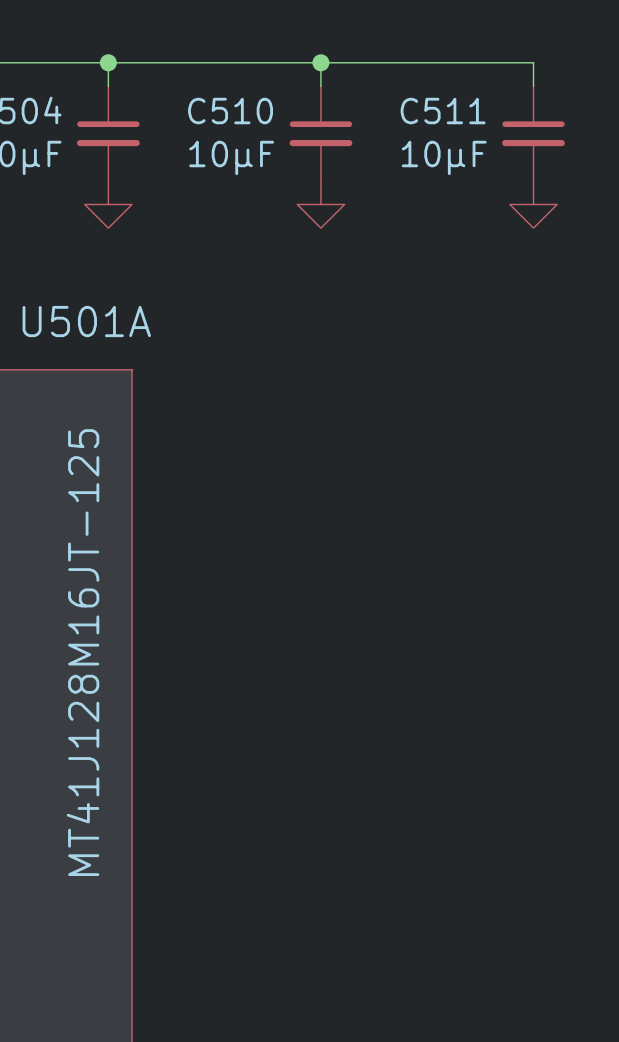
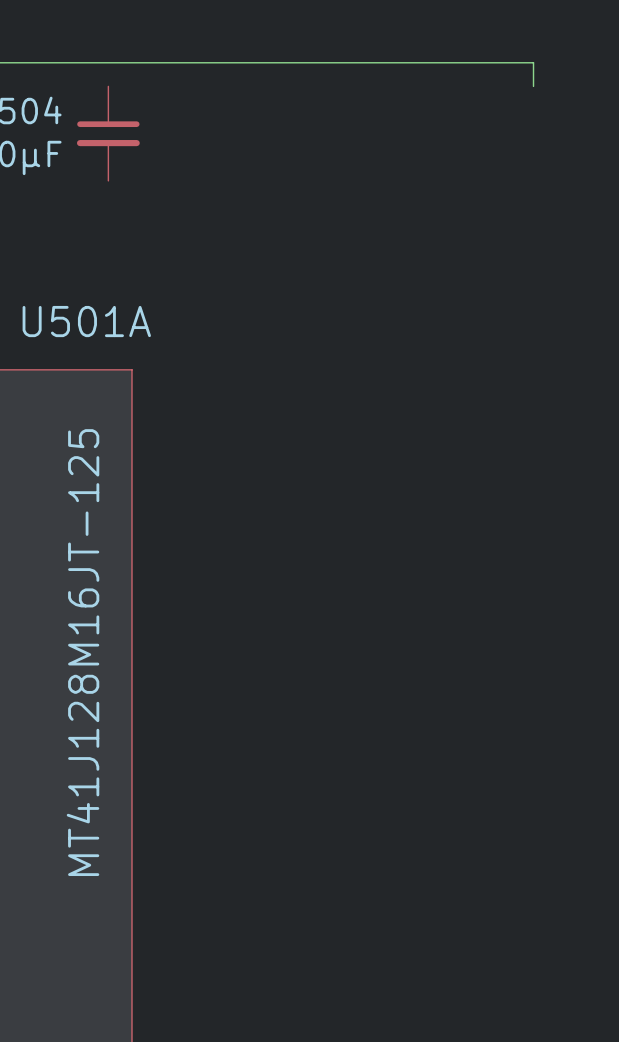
wire: (108, 62) (108, 86) -> none
junction: (108, 62) -> none
wire: (320, 62) (320, 86) -> none
junction: (320, 62) -> none
C510: 10µF (320, 133) -> none
C511: 10µF (533, 133) -> none
power symbol: (108, 204) -> none
power symbol: (320, 204) -> none
power symbol: (533, 204) -> none

